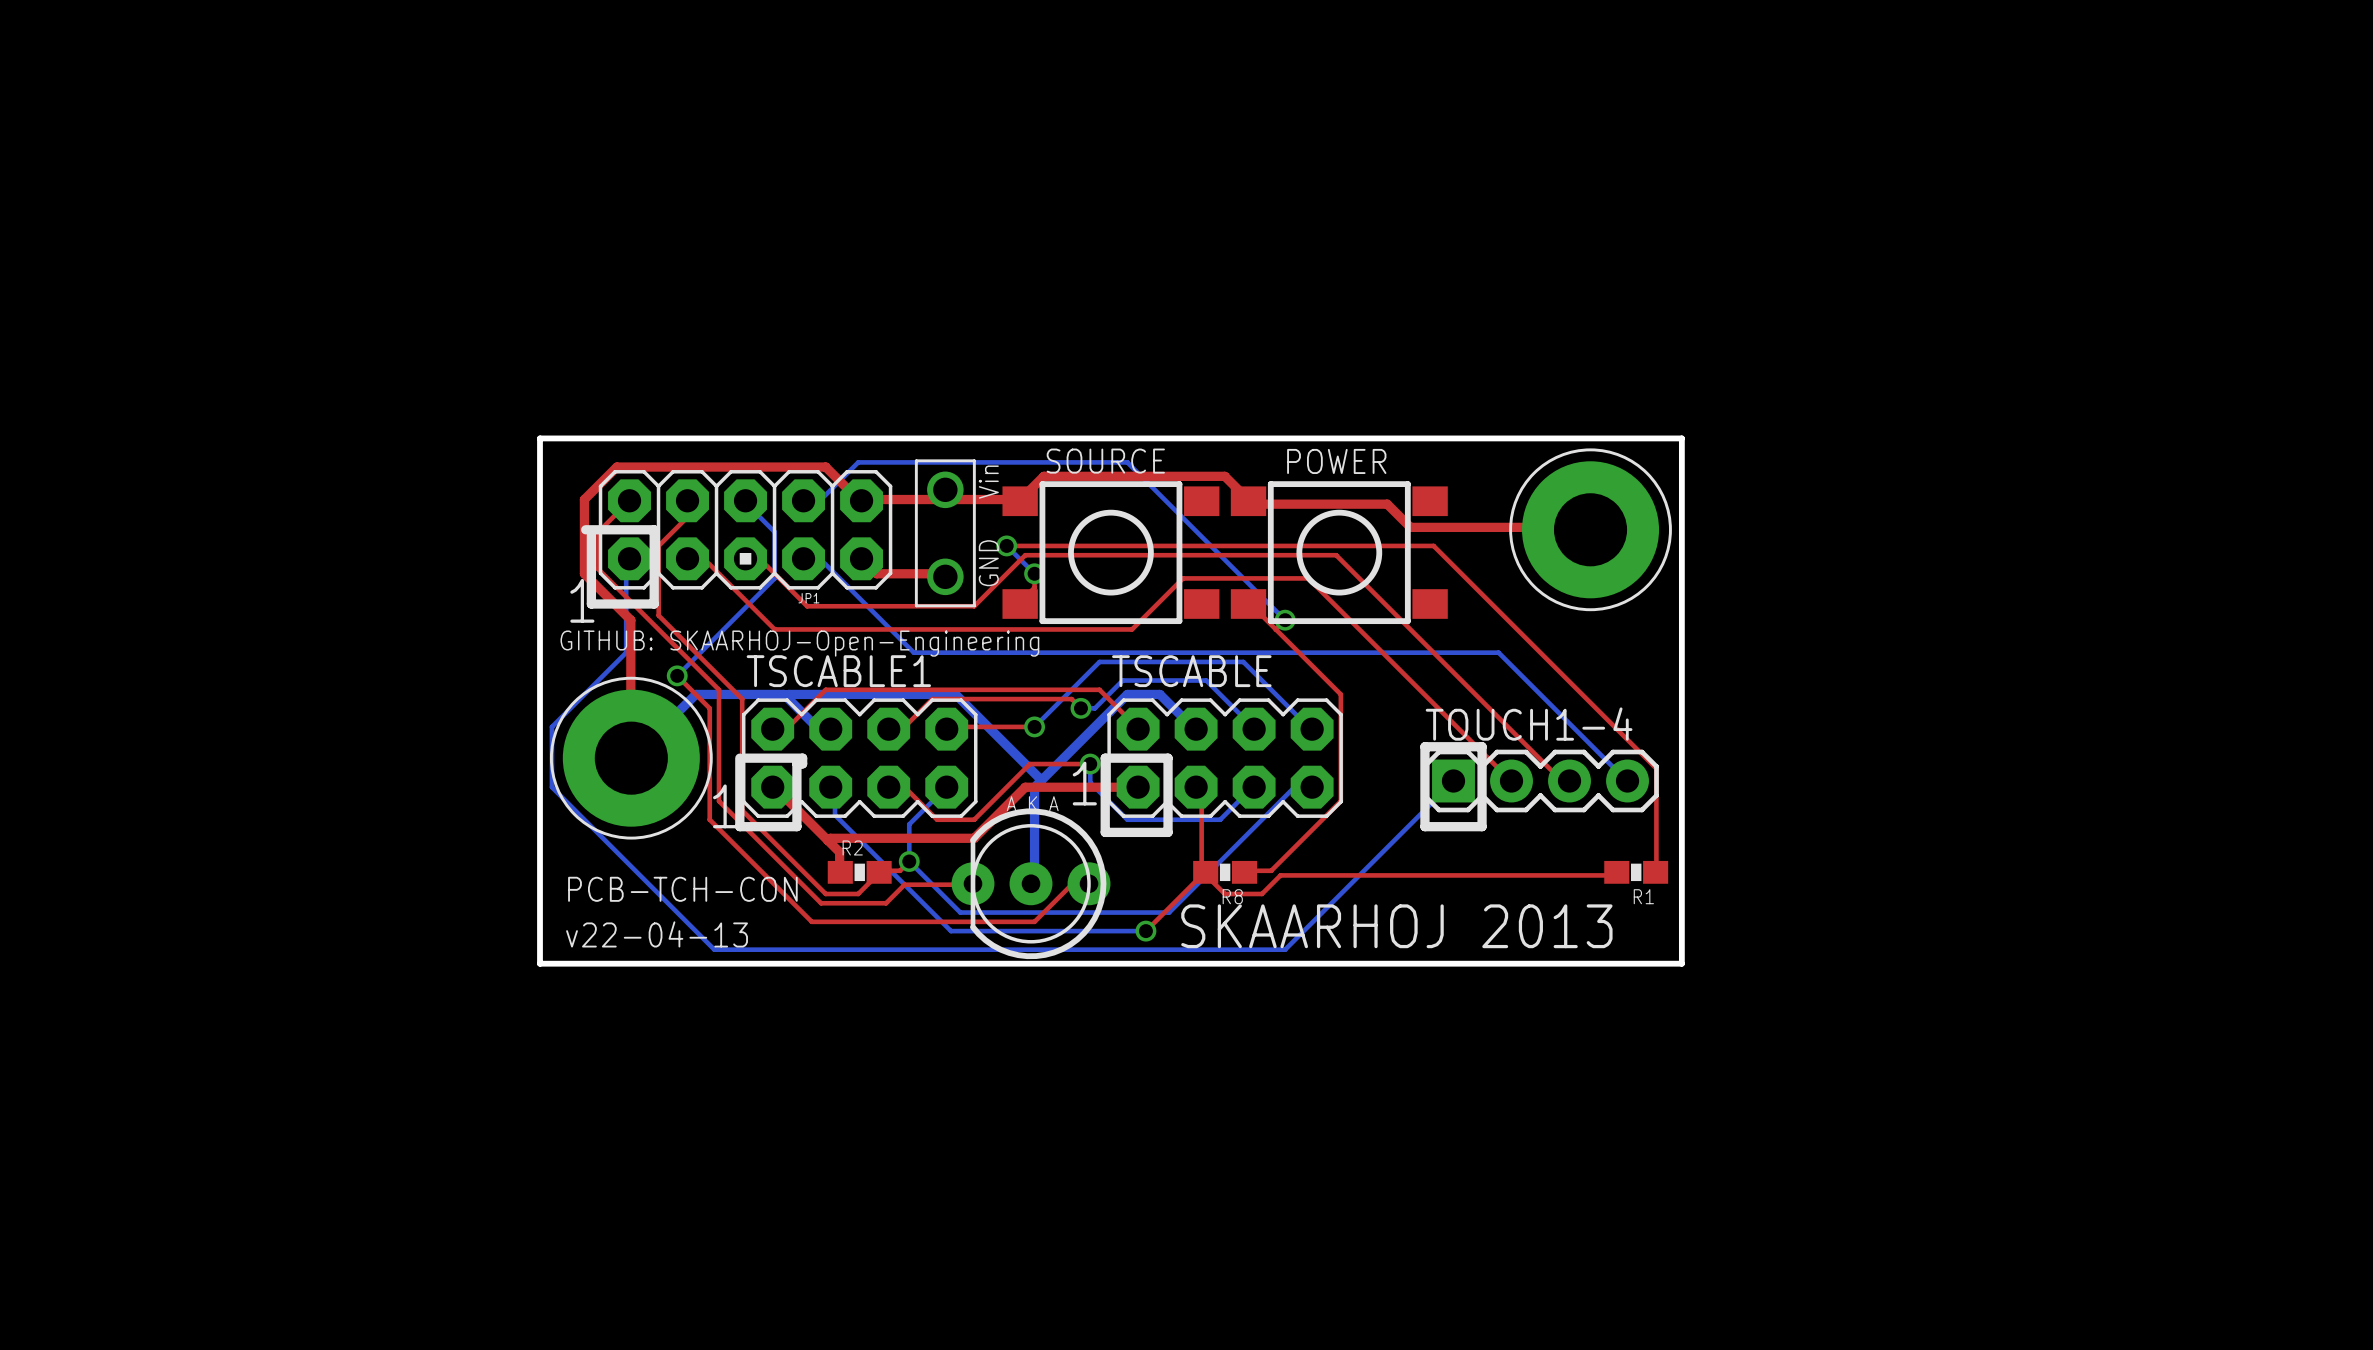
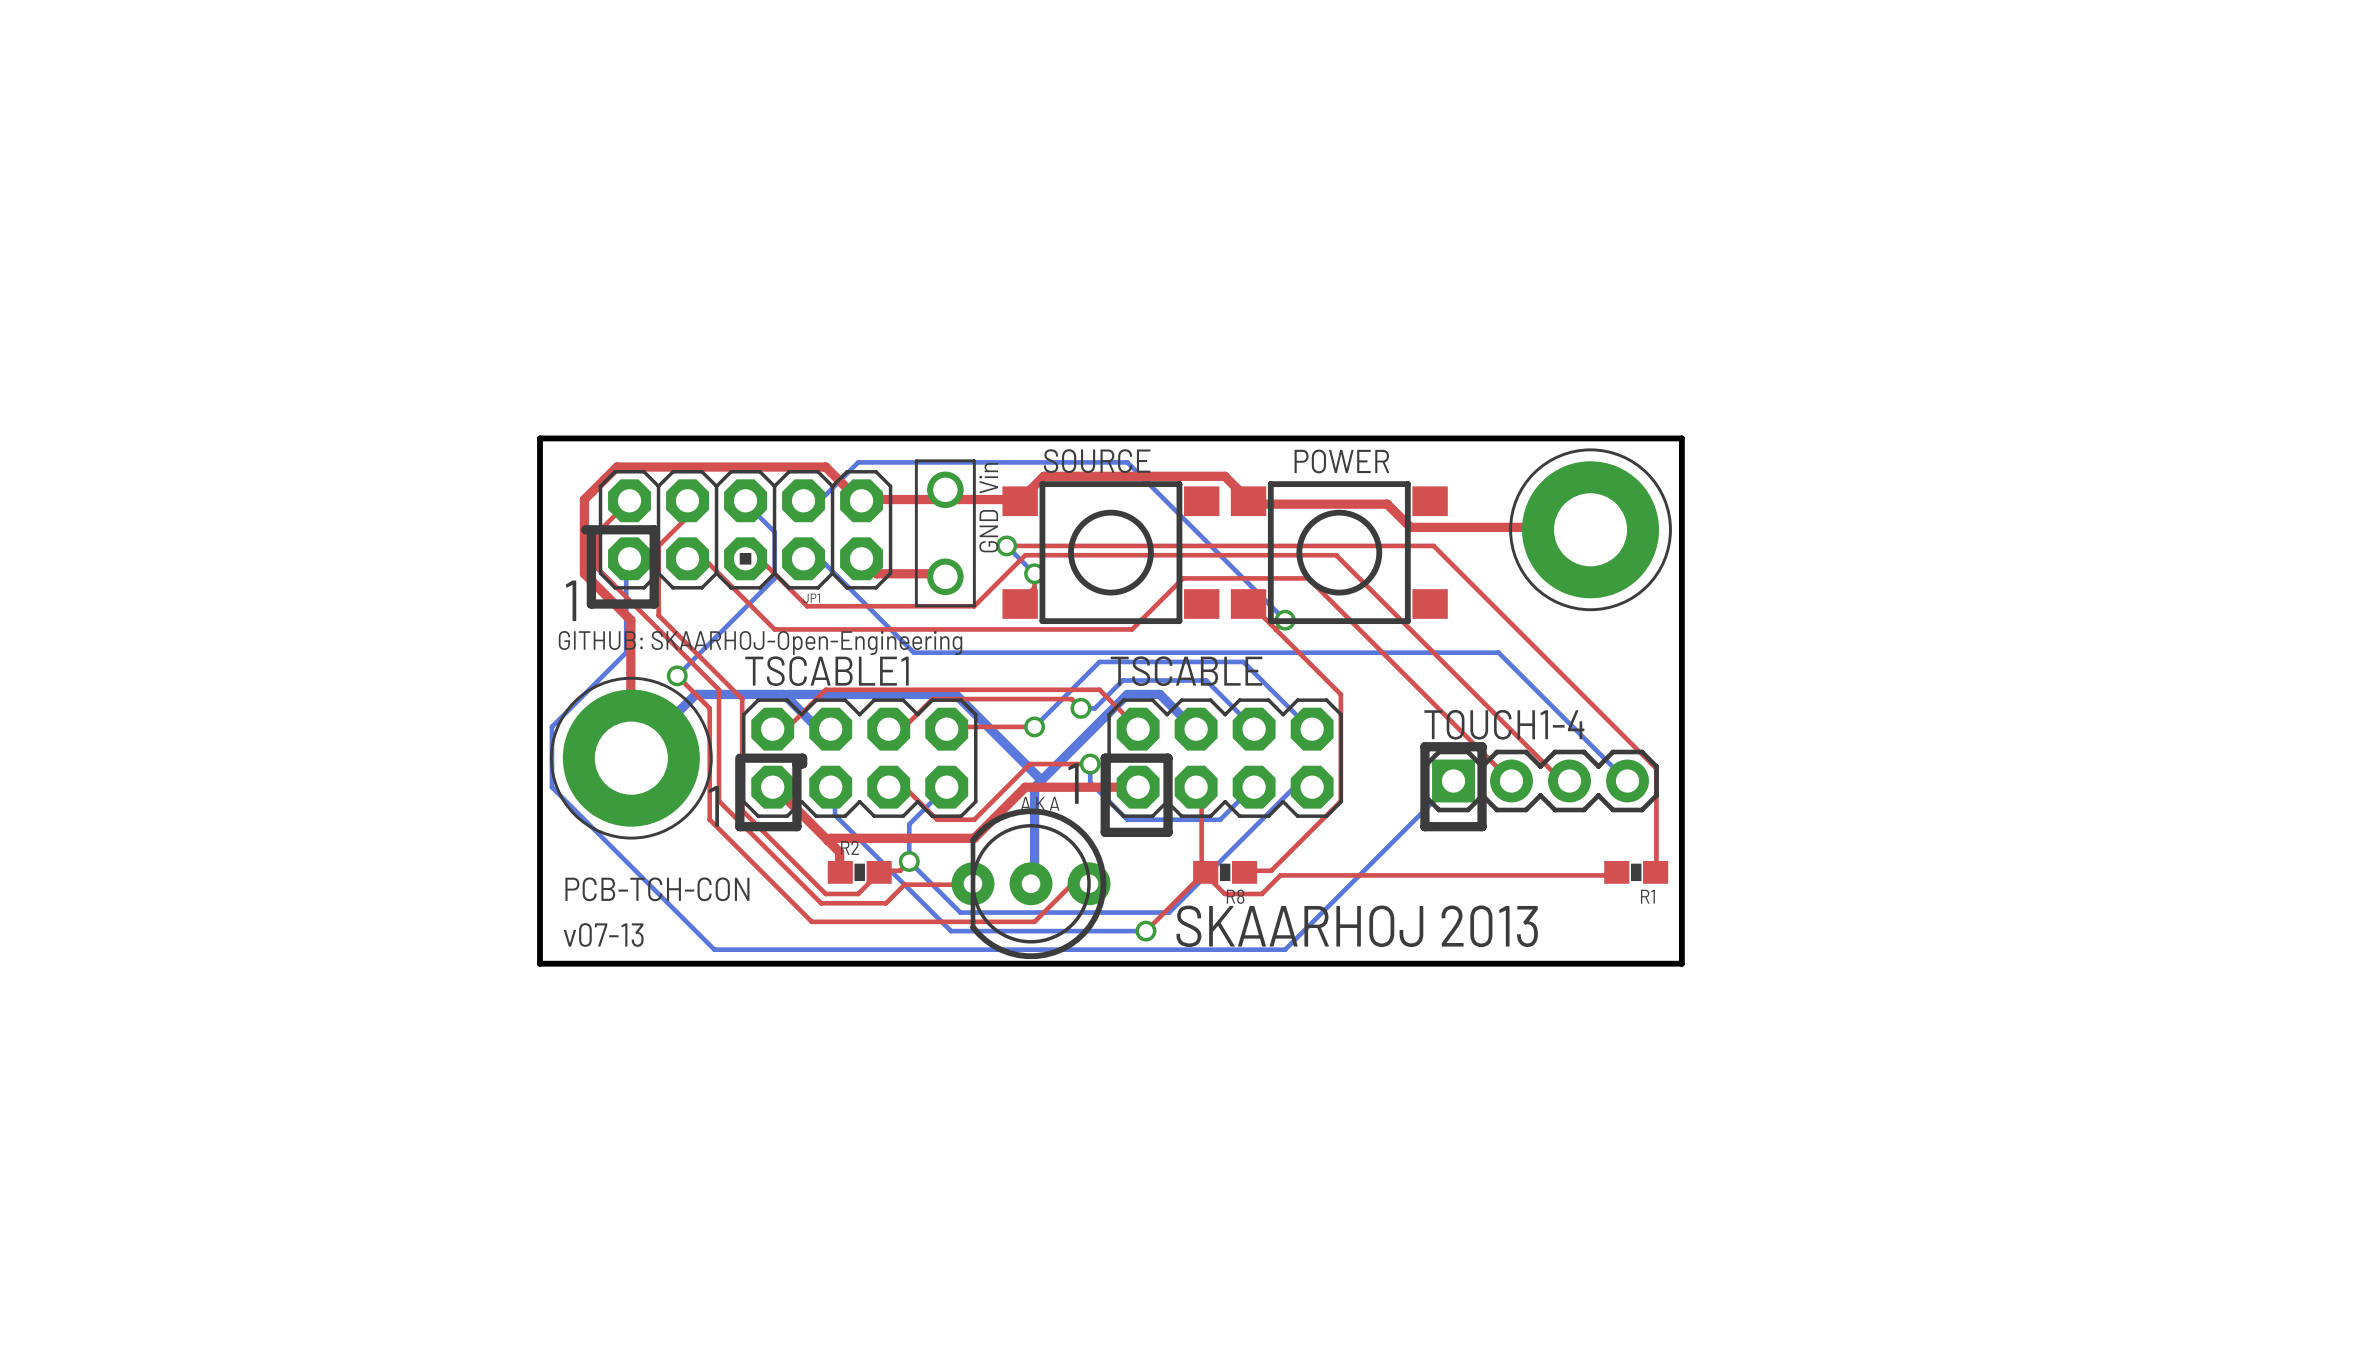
text: v22-04-13 (657, 934) -> v07-13 (603, 934)

